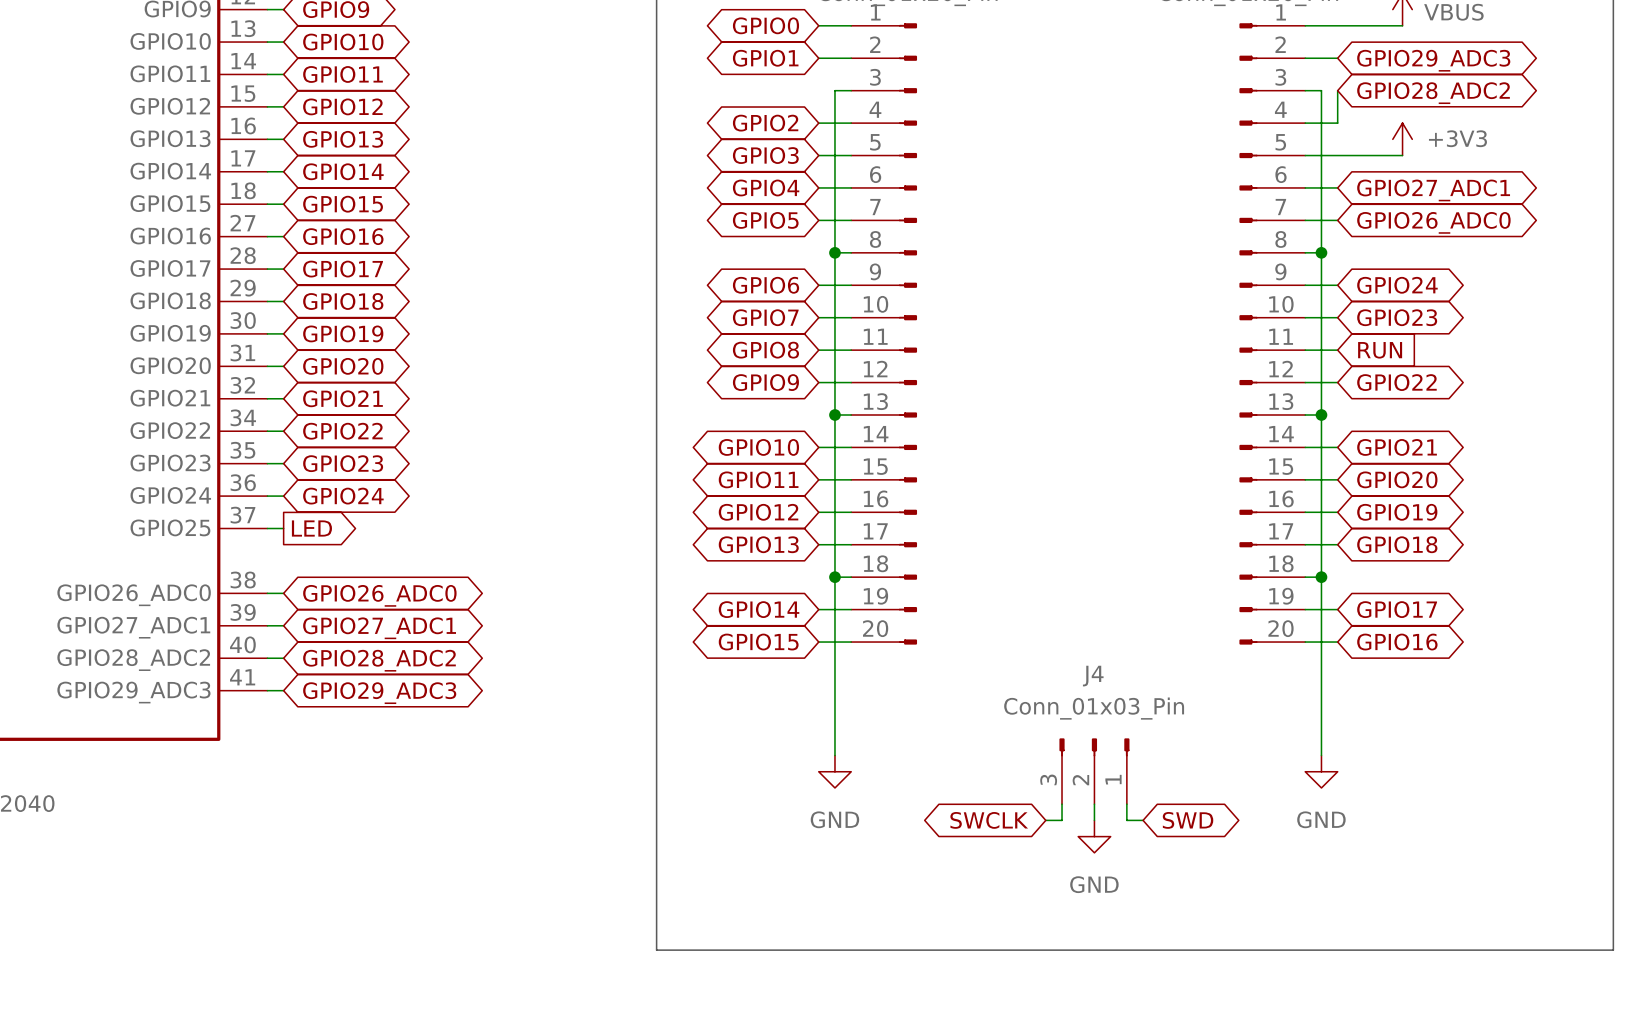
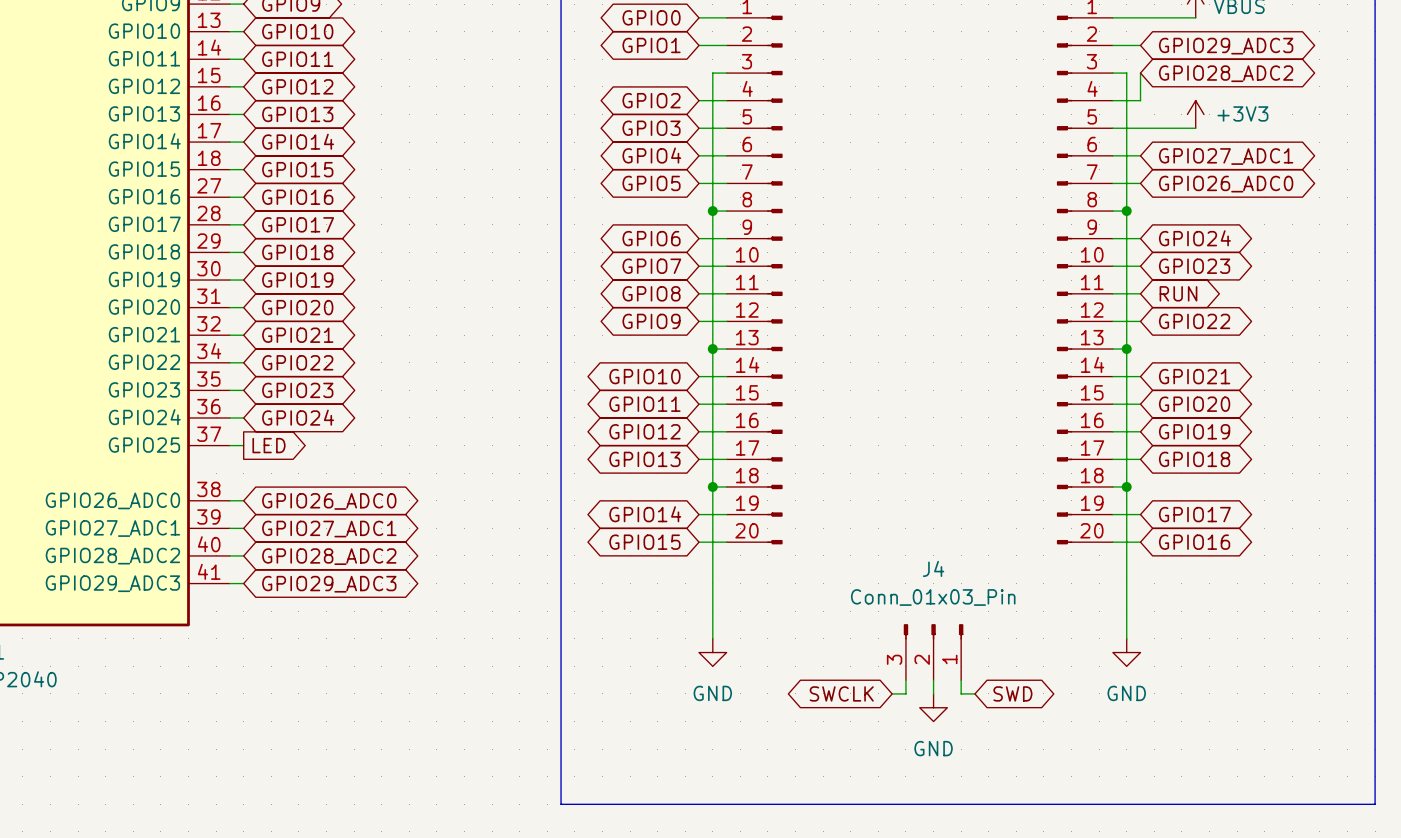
global label shape: input (1380, 350) -> bidirectional (1178, 293)

